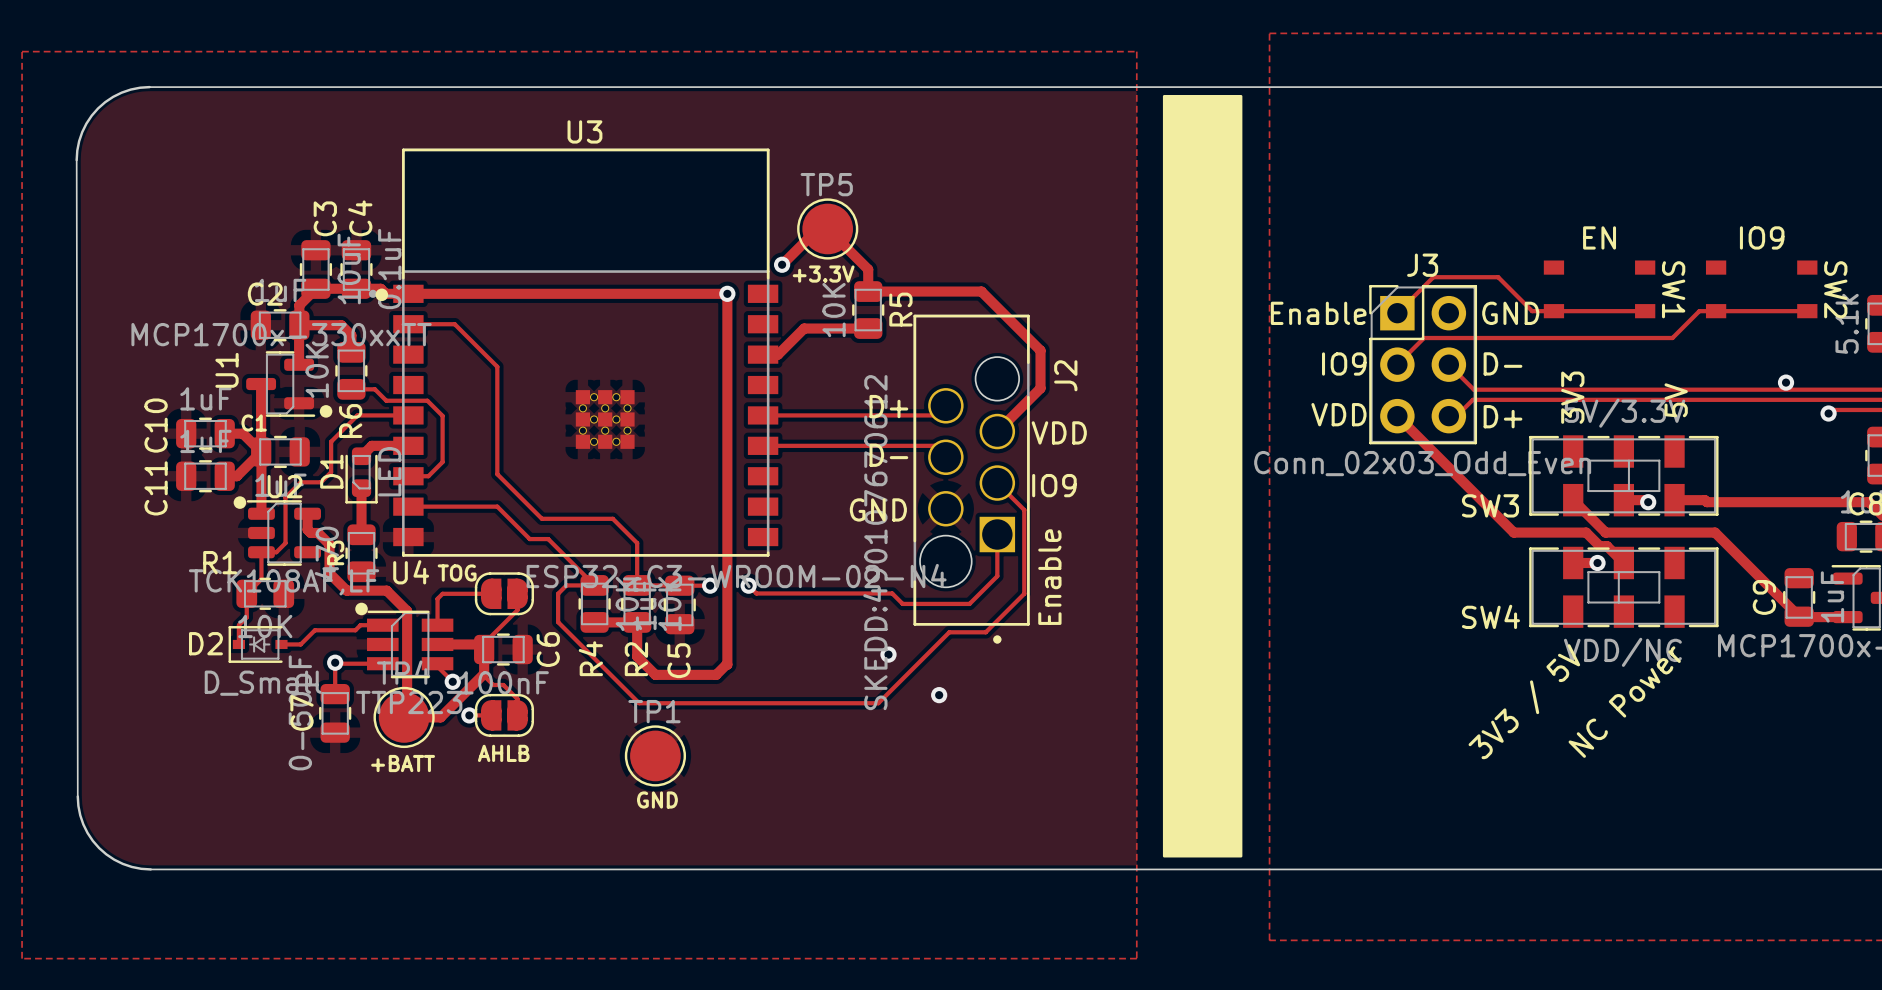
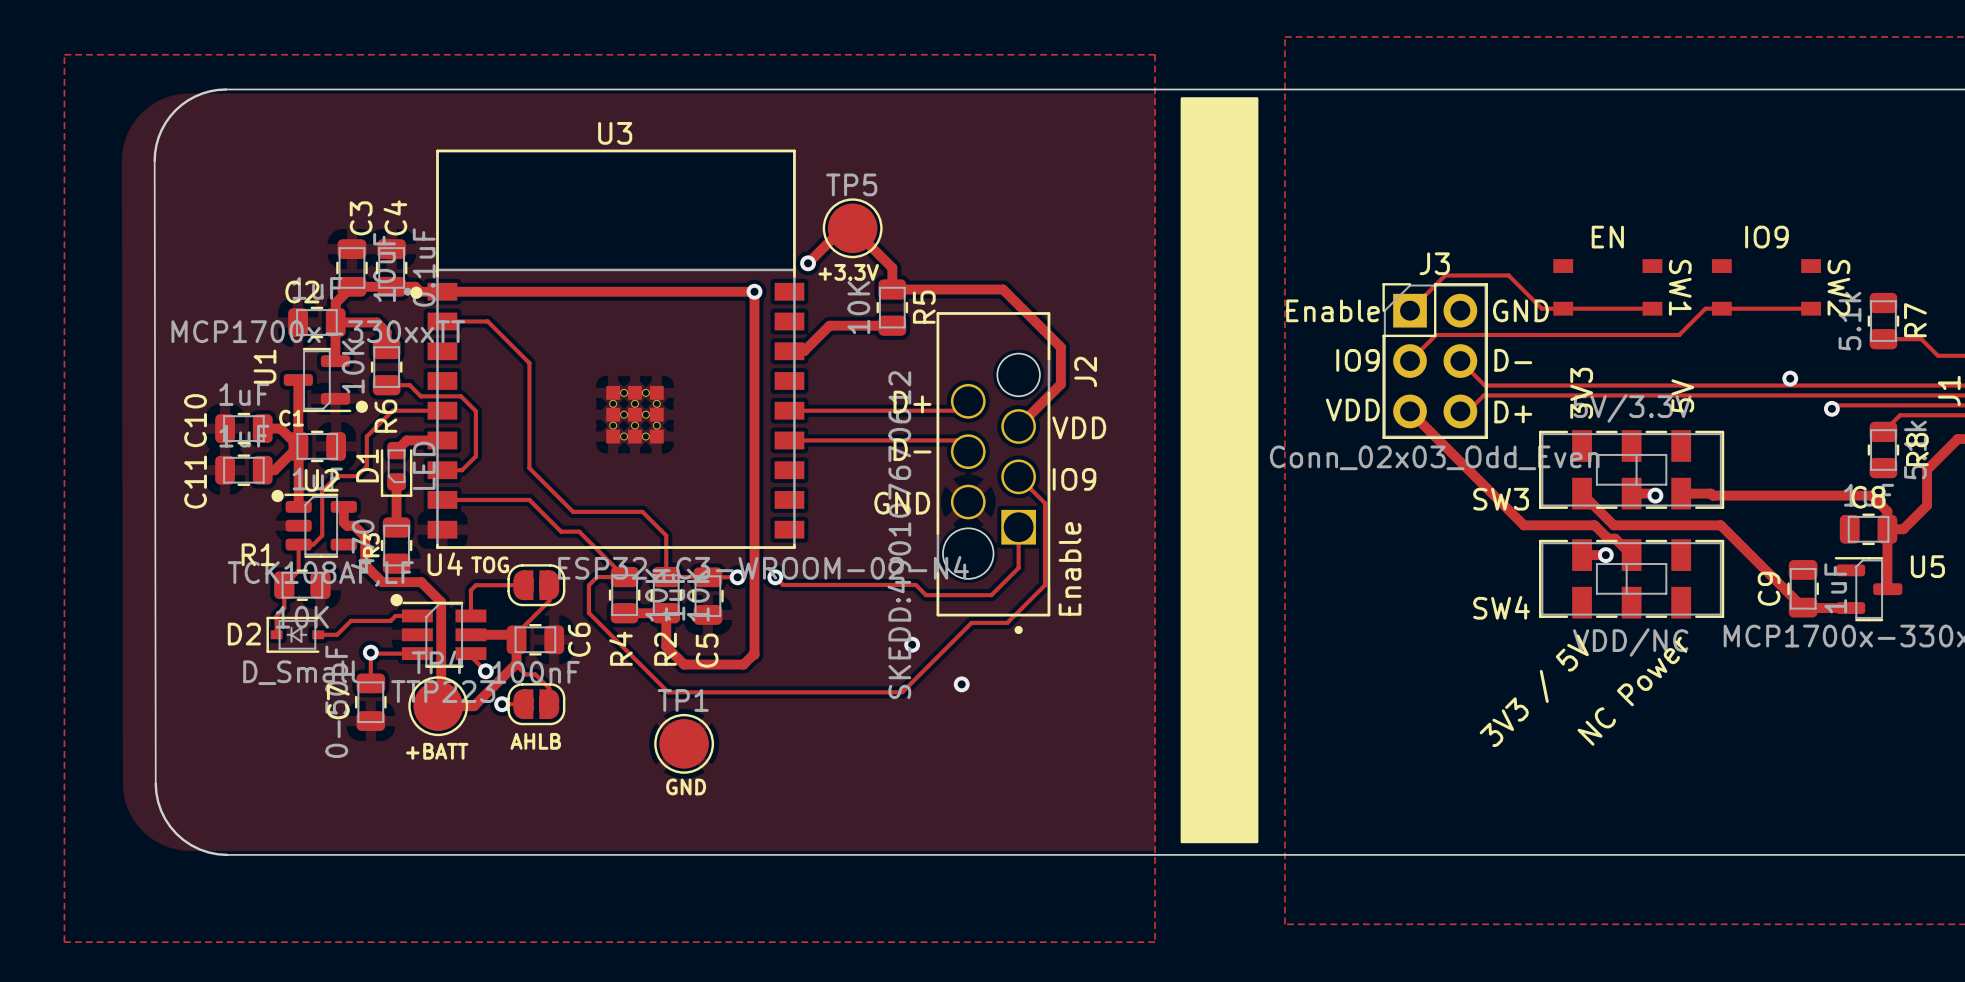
board edge: (187, 87) (140, 87) (113, 96) (98, 108) (86, 123) (79, 141) (76, 160) (78, 806) (87, 832) (99, 848) (114, 859) (141, 868) (188, 869) -> (226, 89) (202, 93) (188, 100) (175, 110) (161, 129) (156, 144) (154, 160) (156, 792) (165, 819) (183, 840) (199, 849) (227, 854)

